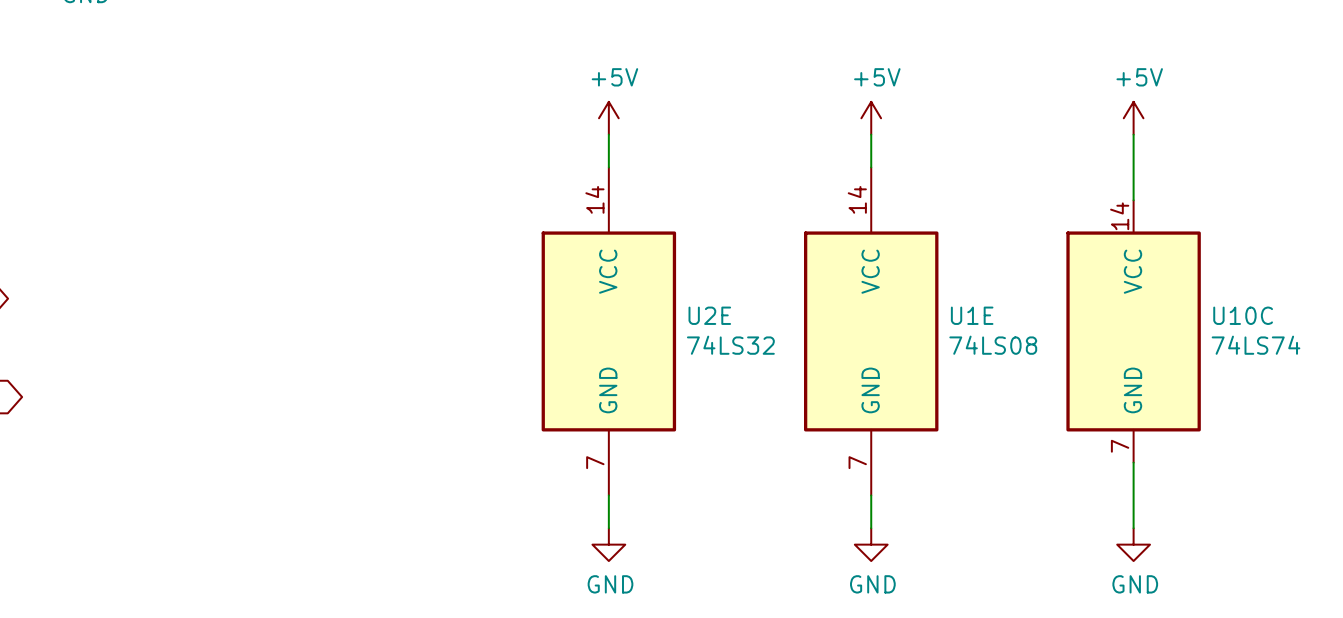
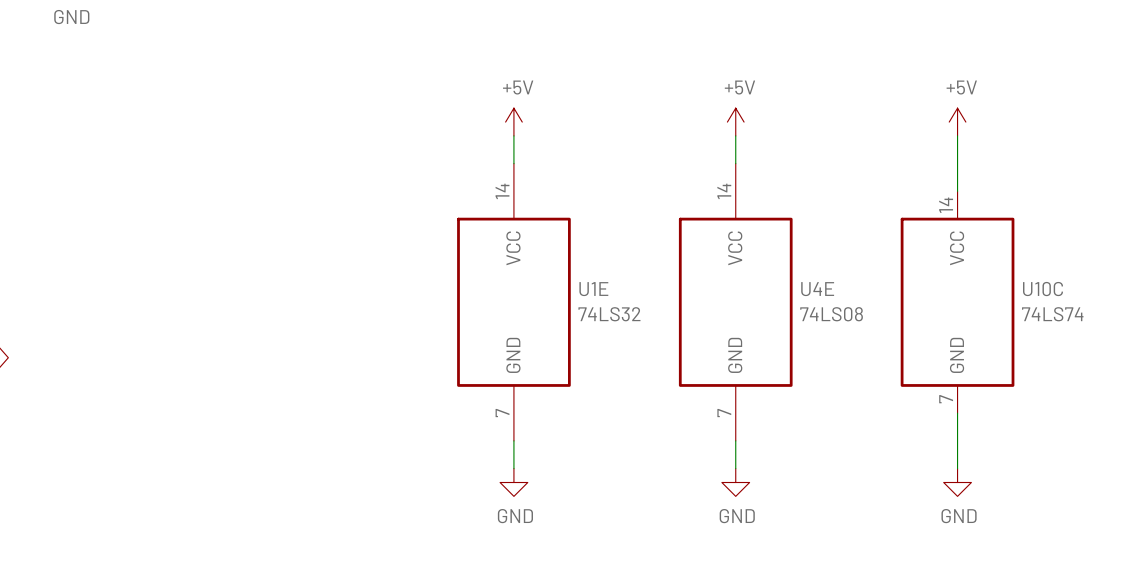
U2E name: U2E (709, 315) -> U1E (593, 289)
U1E name: U1E (972, 315) -> U4E (817, 289)

